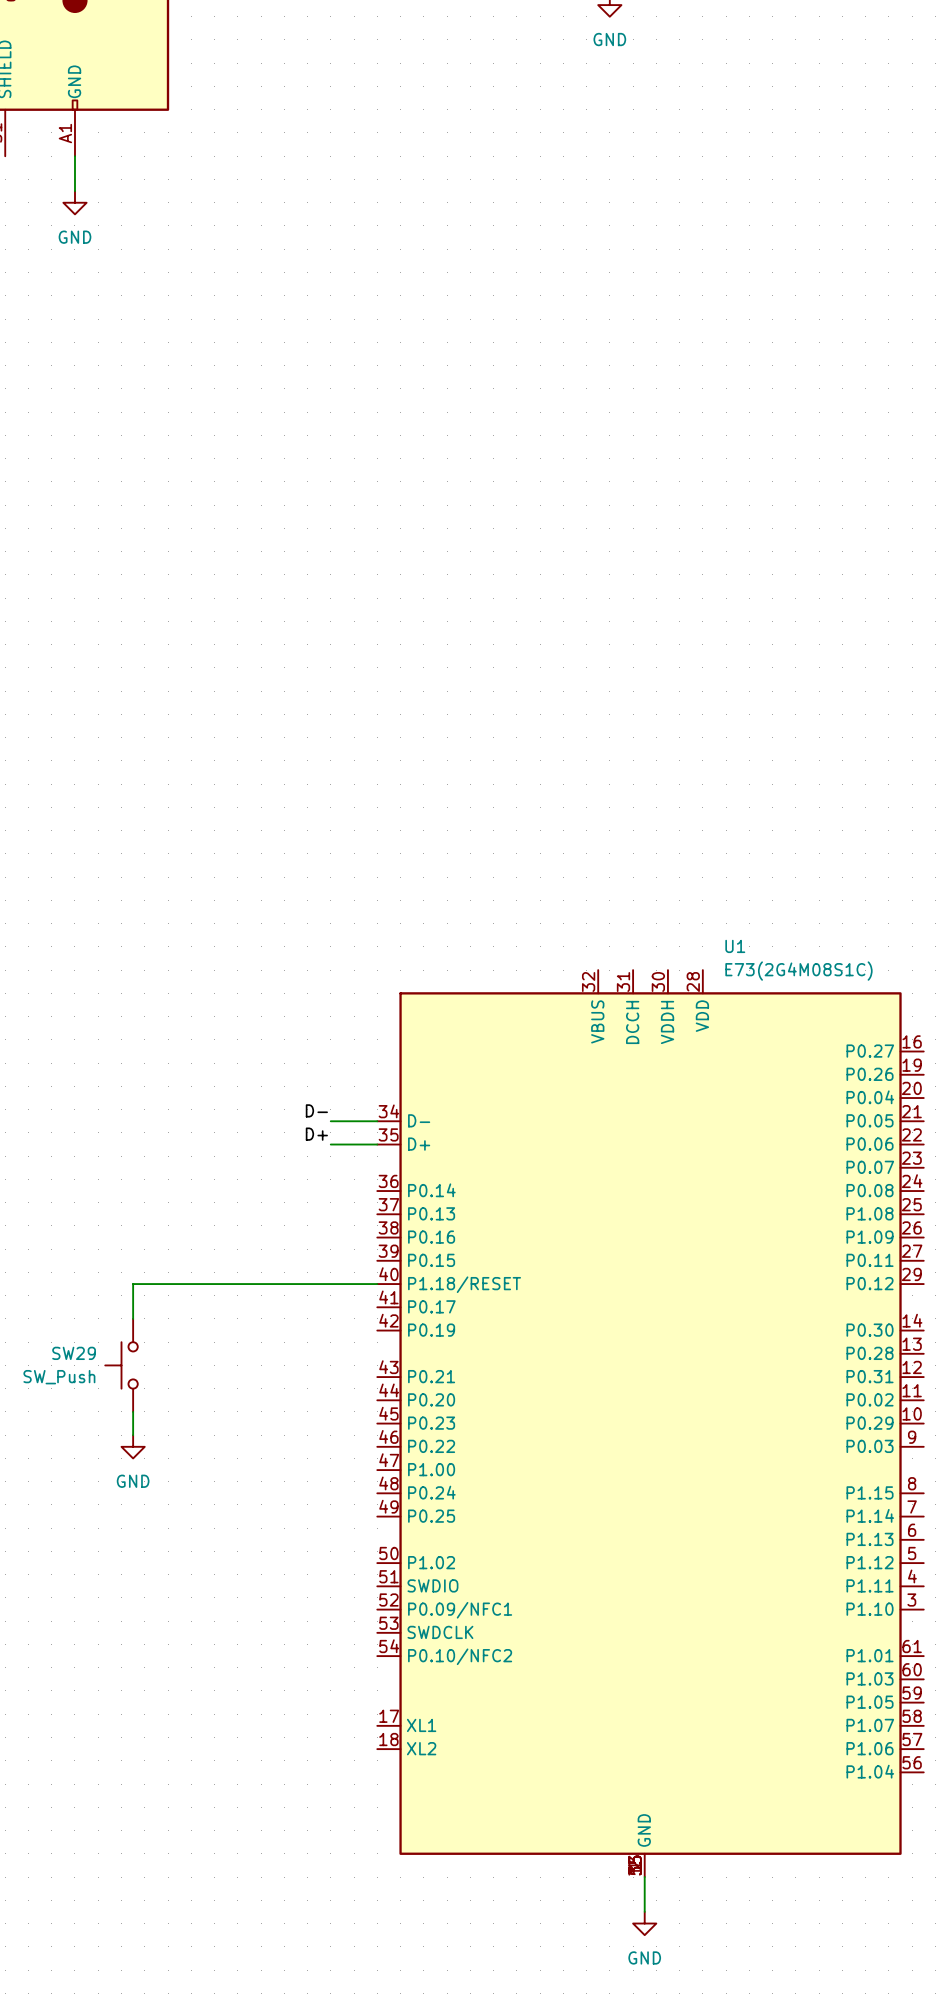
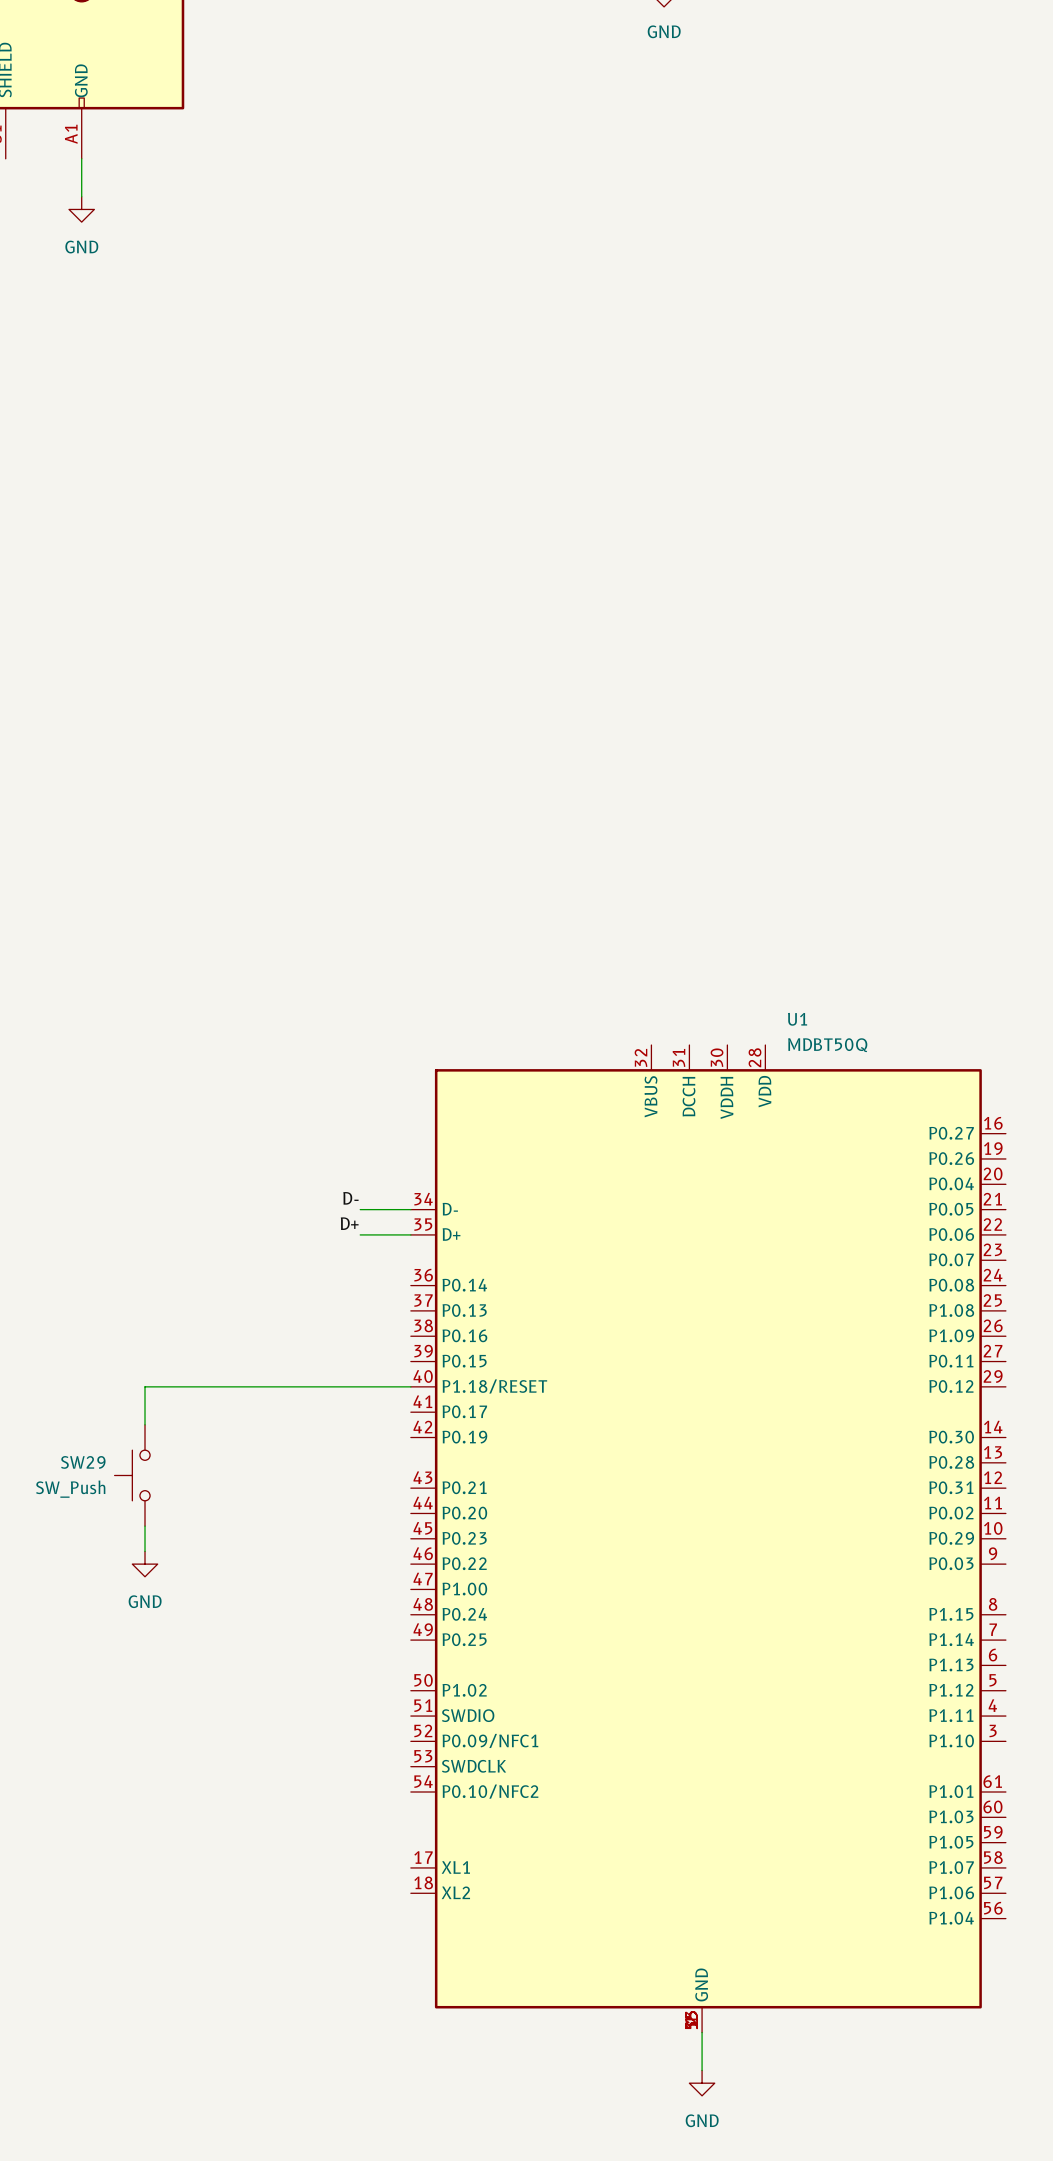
U1 value: E73(2G4M08S1C) (798, 971) -> MDBT50Q (827, 1045)

